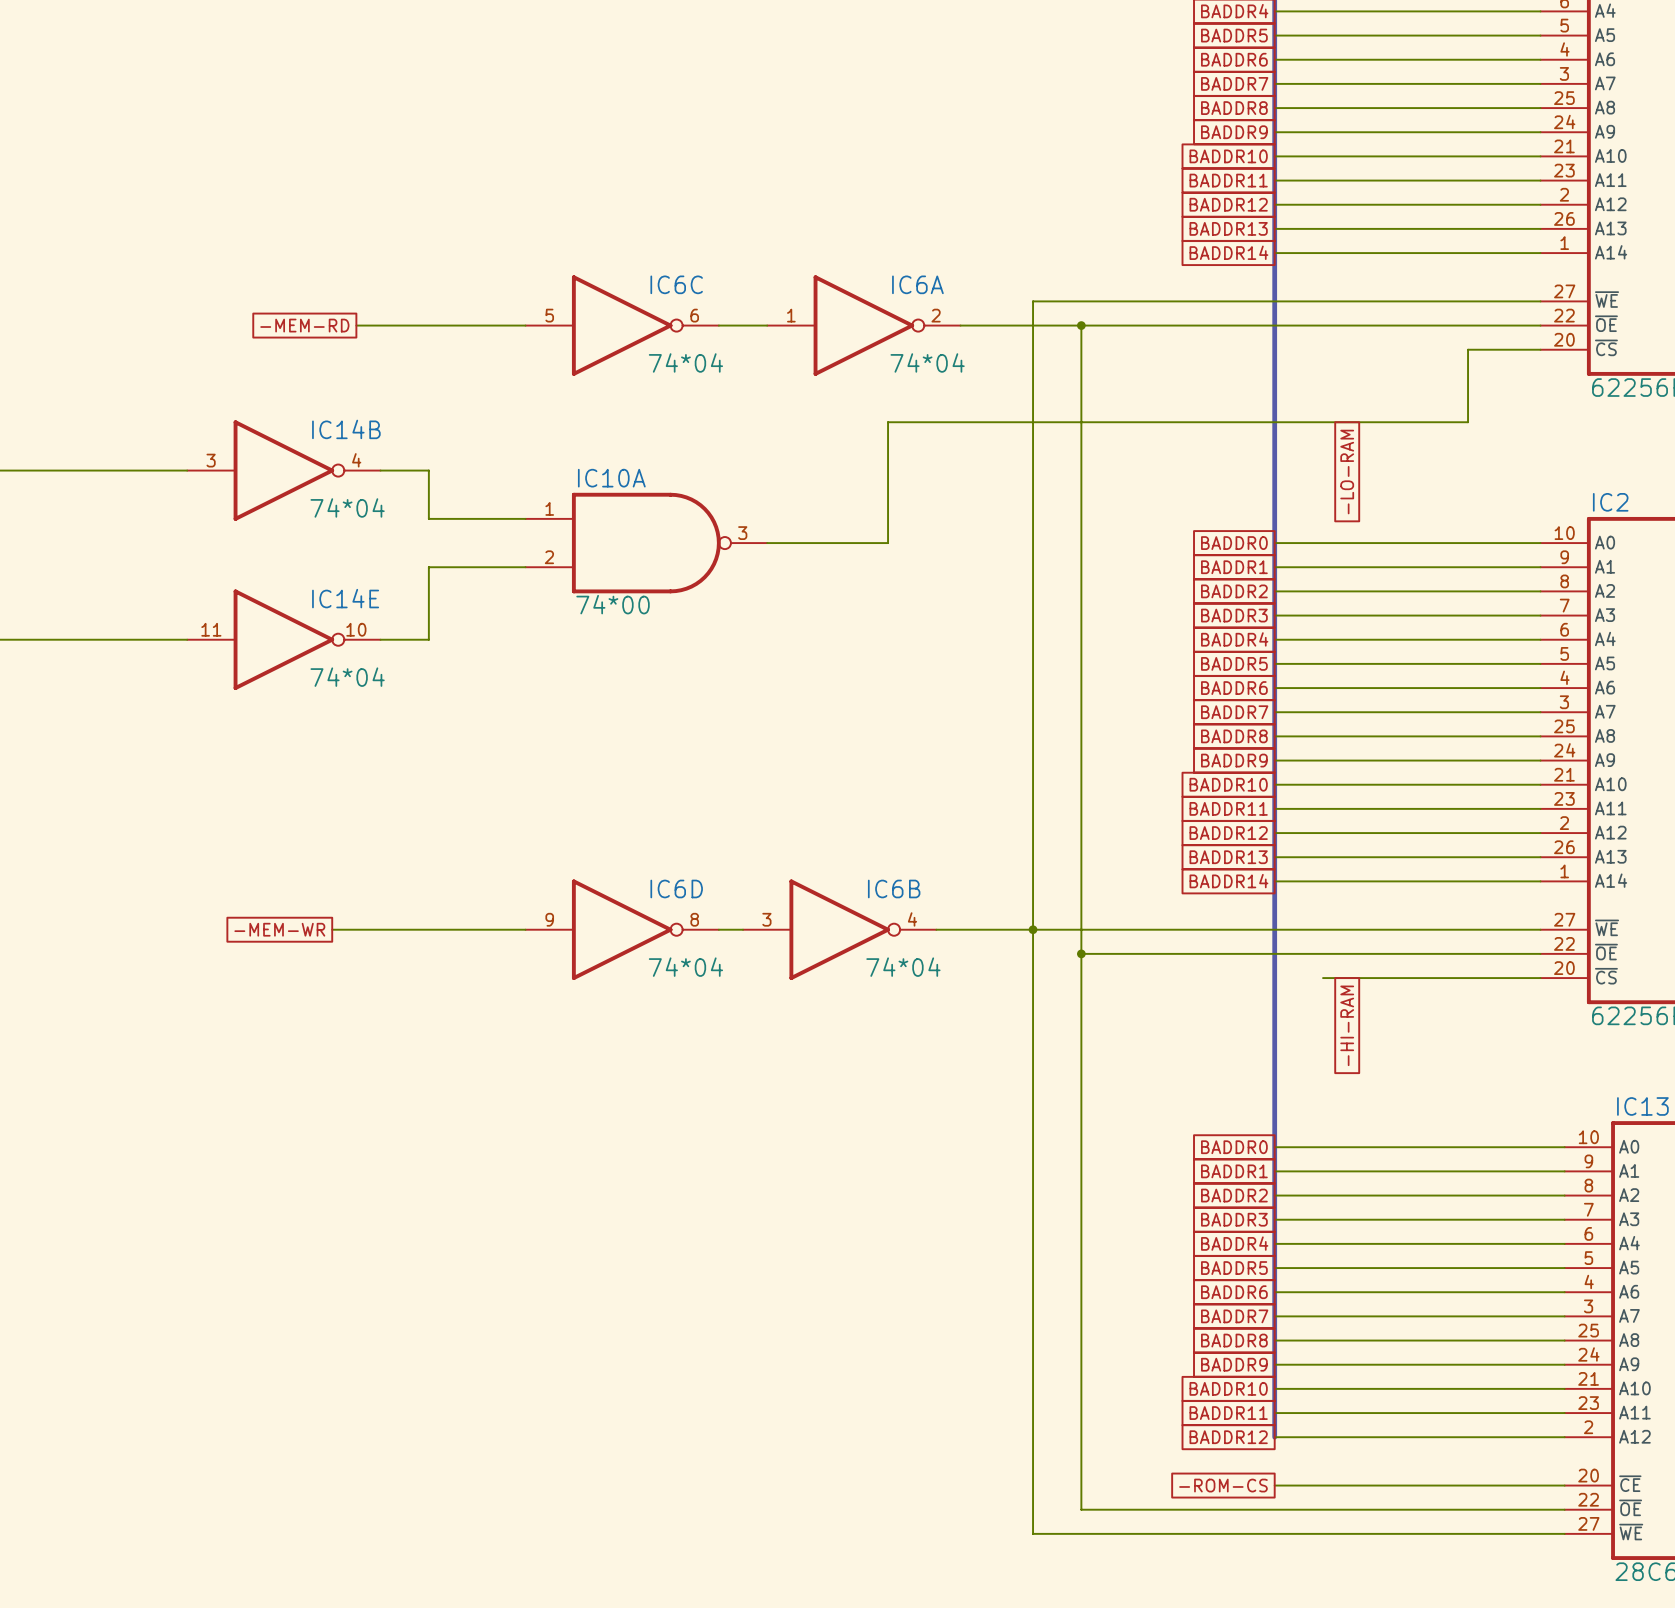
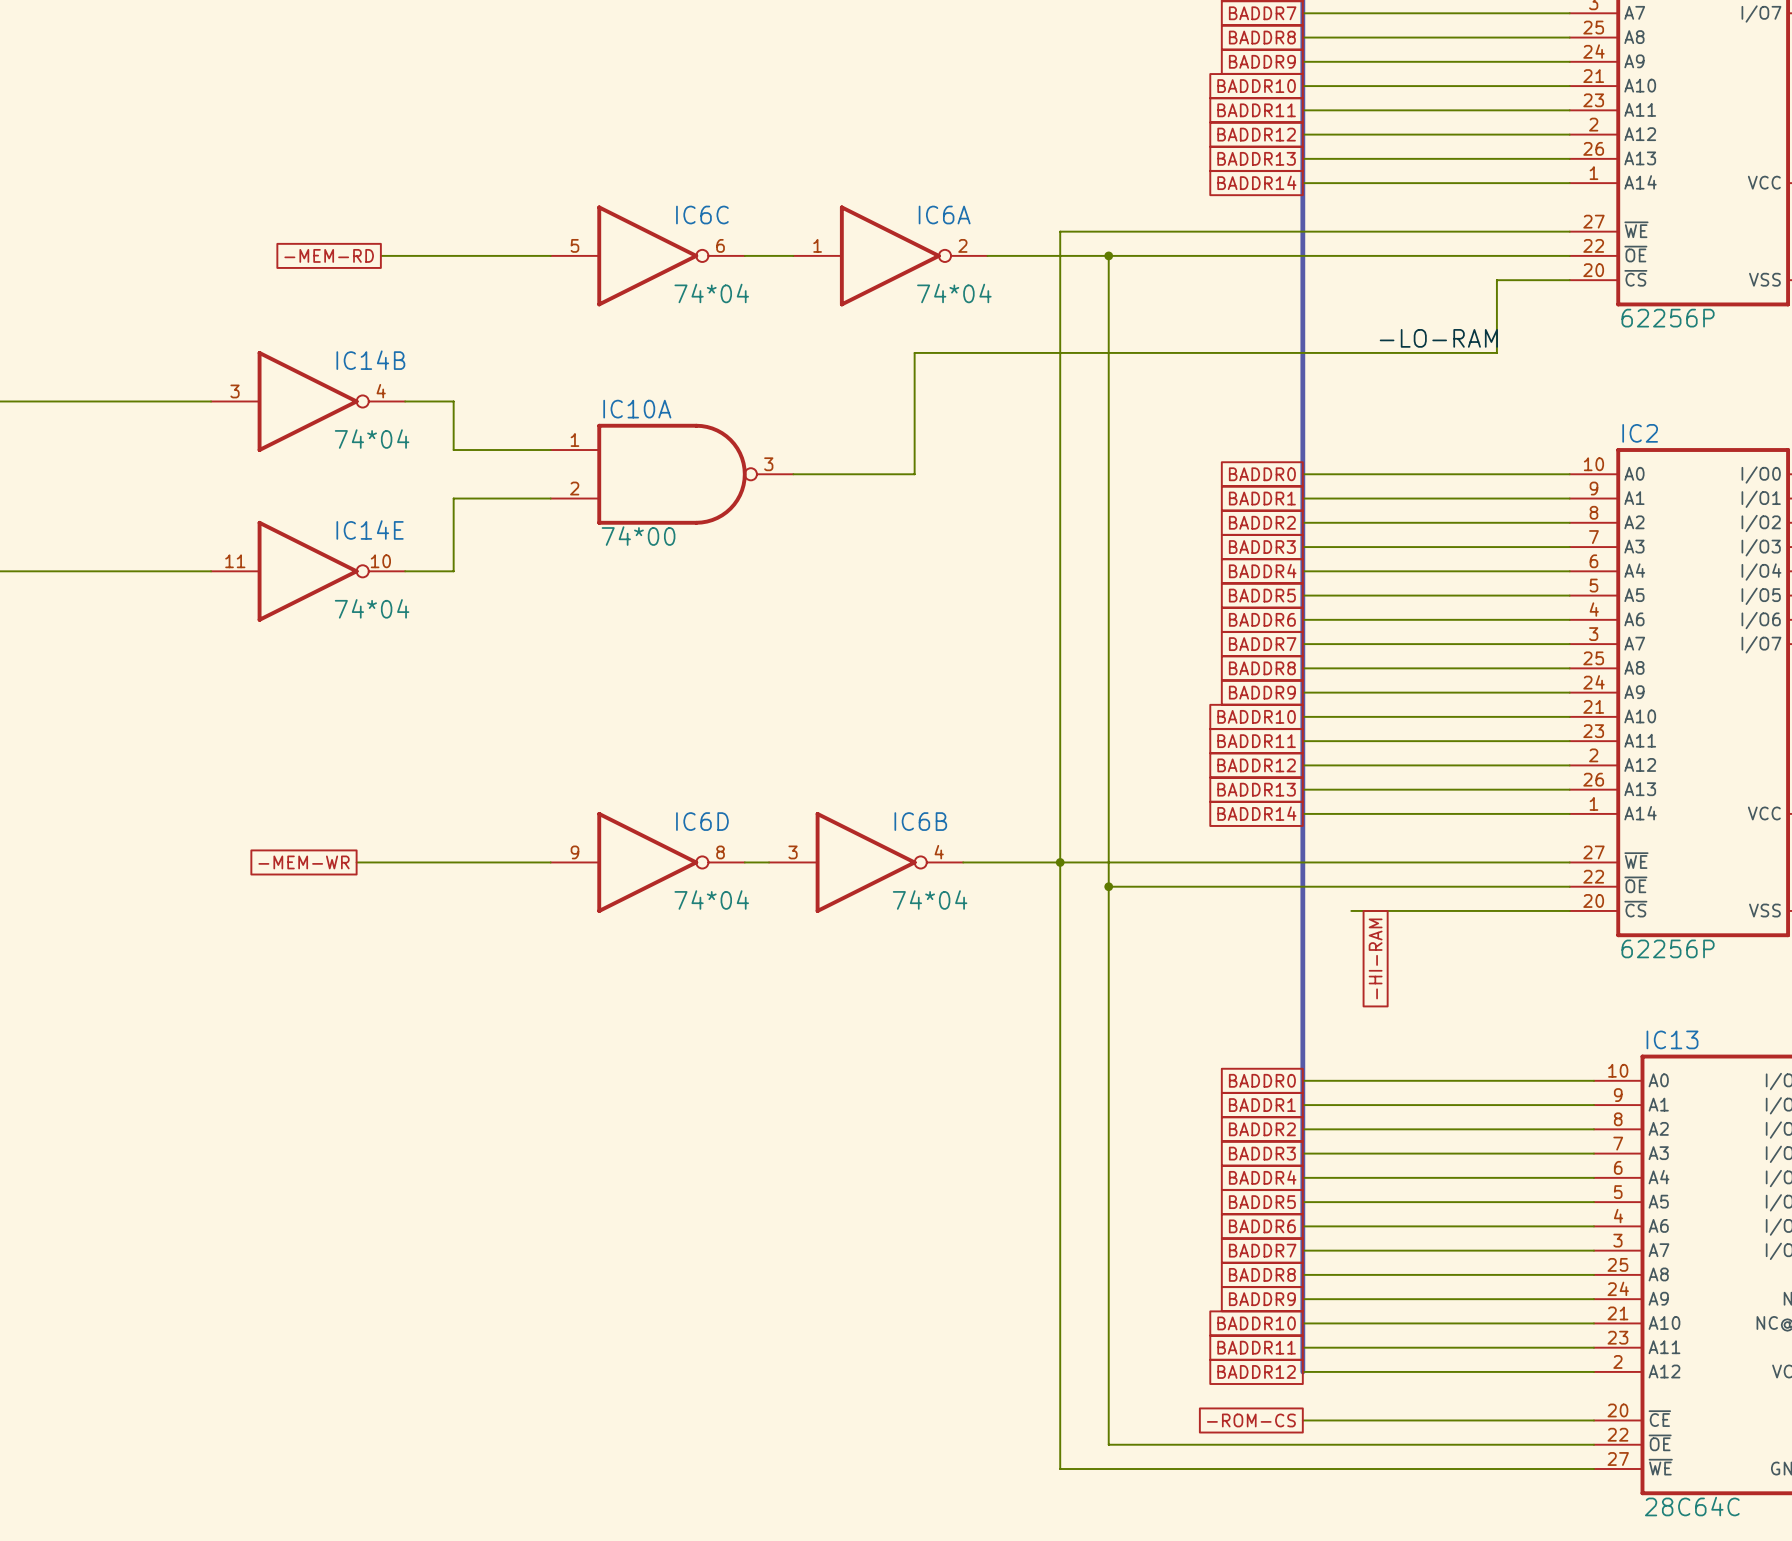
label: none -> -LO-RAM (1438, 338)
global label: -LO-RAM (1347, 472) -> none

